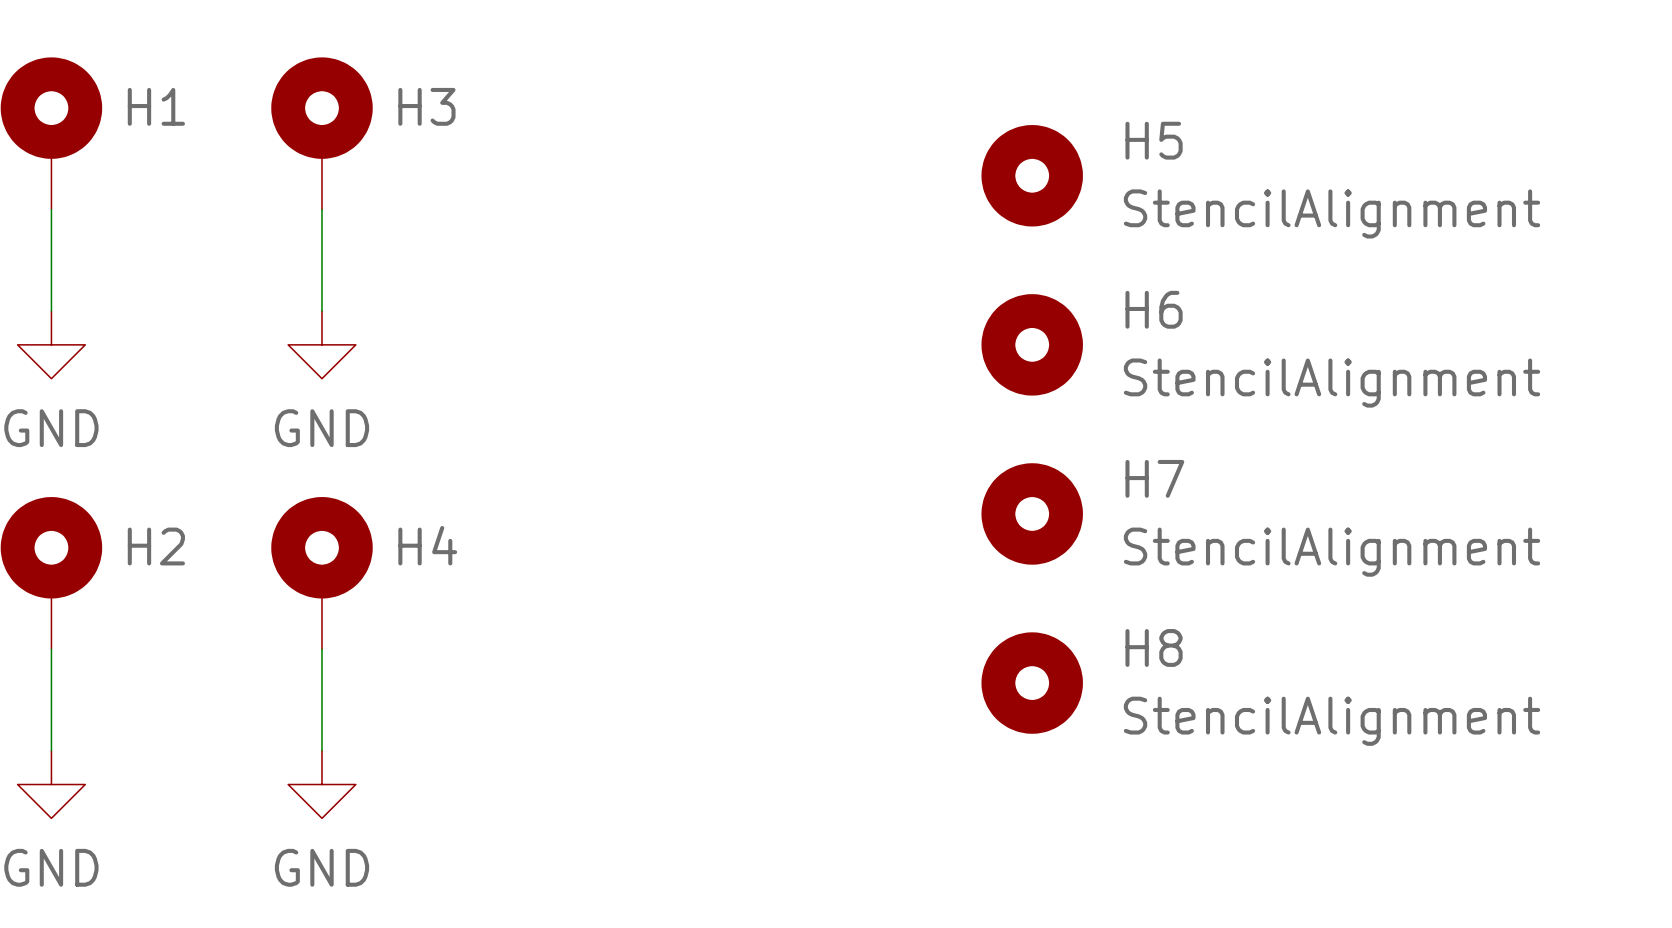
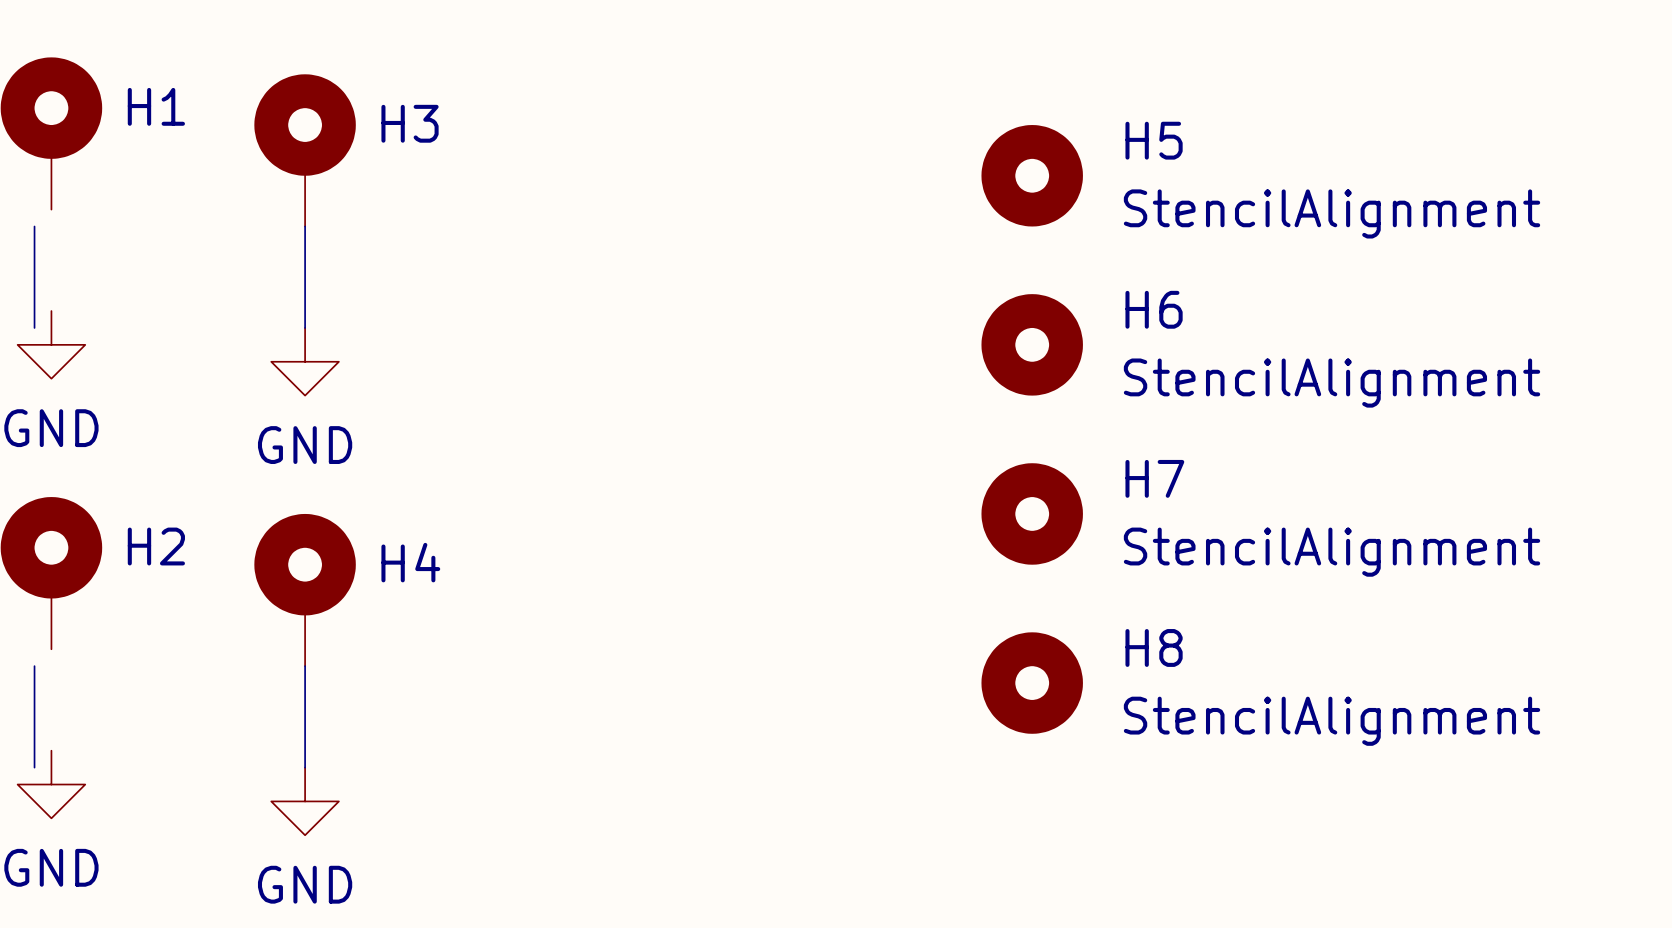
H3 position: (321, 133) -> (305, 150)
wire: (51, 209) (51, 311) -> (34, 226) (34, 327)
wire: (321, 209) (321, 311) -> (305, 226) (305, 327)
power symbol position: GND (321, 344) -> GND (305, 361)
H4 position: (321, 573) -> (305, 590)
wire: (51, 649) (51, 750) -> (34, 666) (34, 767)
wire: (321, 649) (321, 750) -> (305, 666) (305, 767)
power symbol position: GND (321, 784) -> GND (305, 801)

